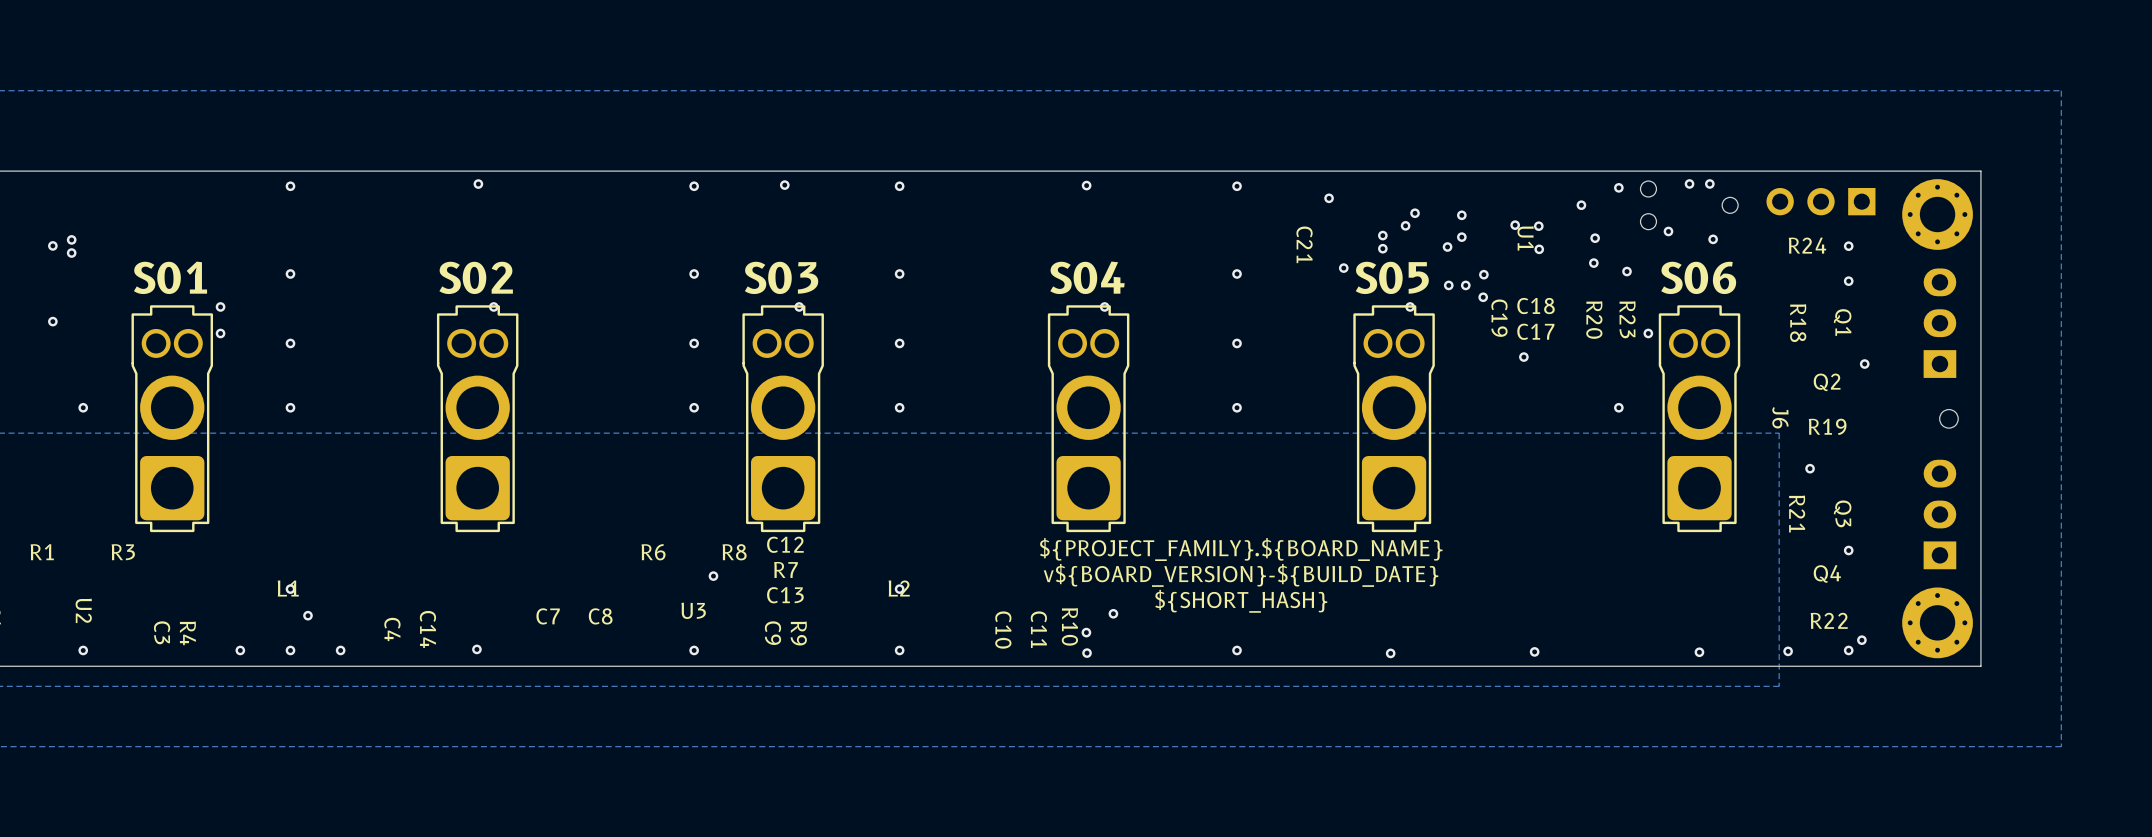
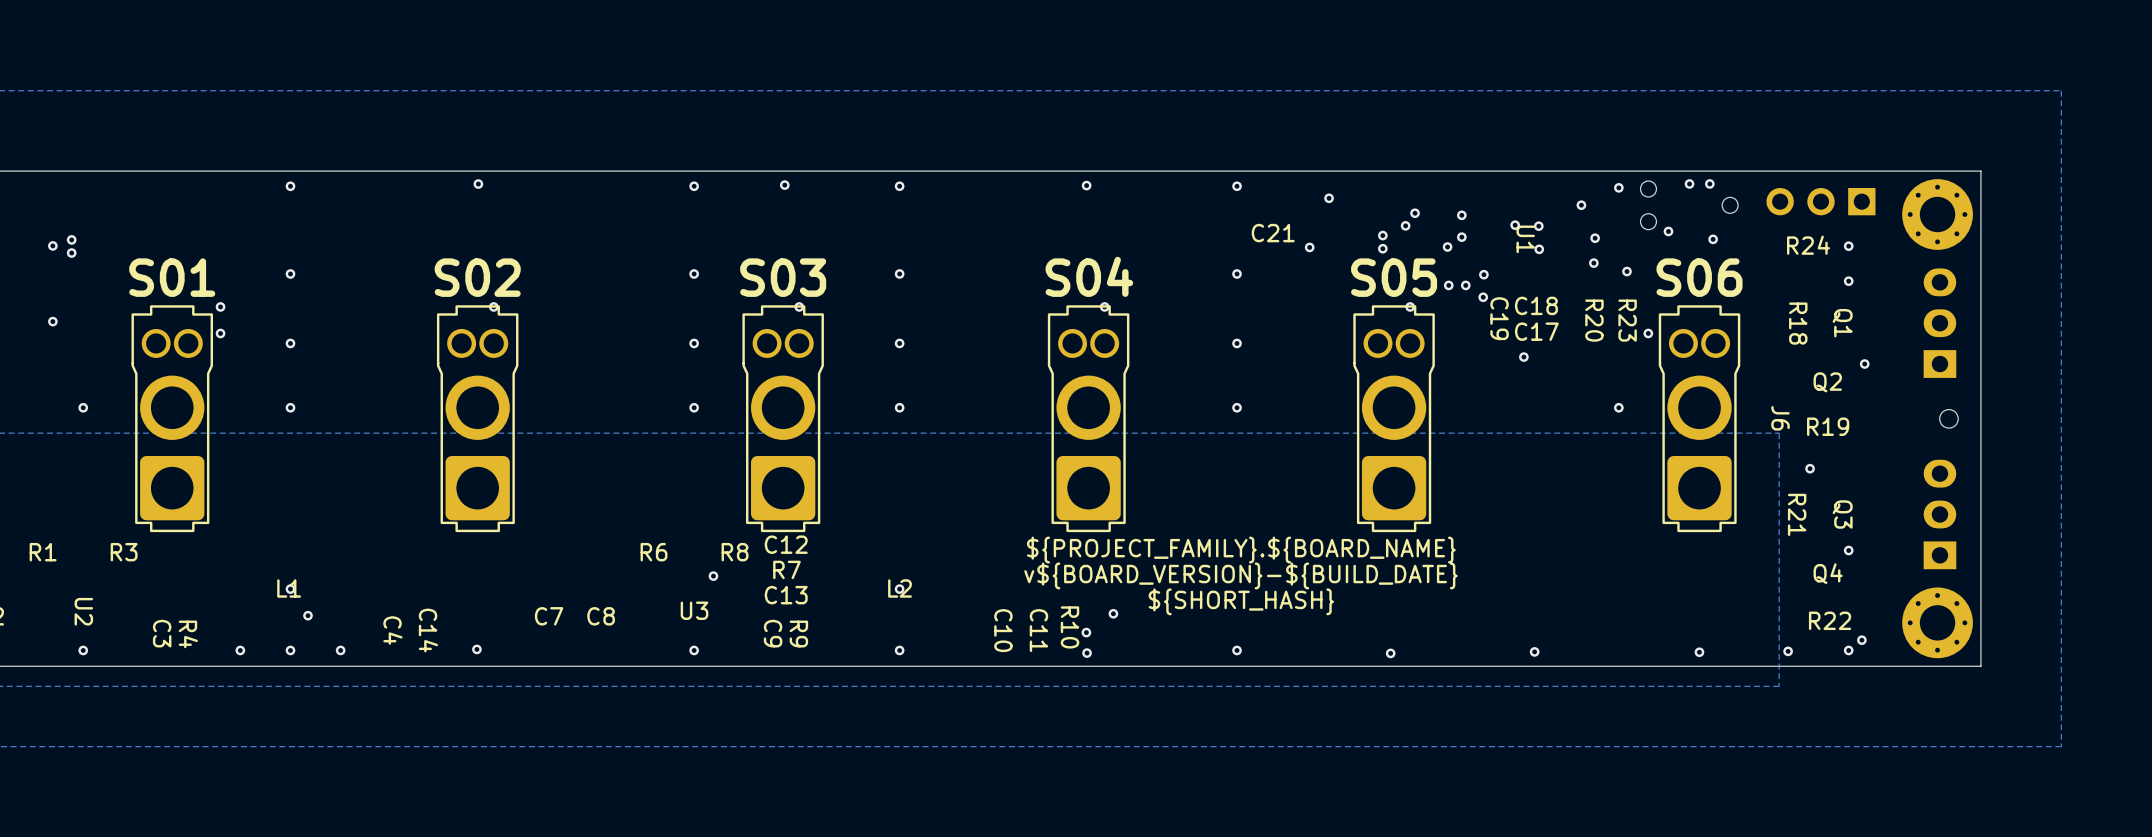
C21 position: (1304, 244) -> (1273, 233)
C21 name rotation: 0° (1304, 244) -> 90° counterclockwise (1273, 233)
via position: (1343, 268) -> (1309, 247)

